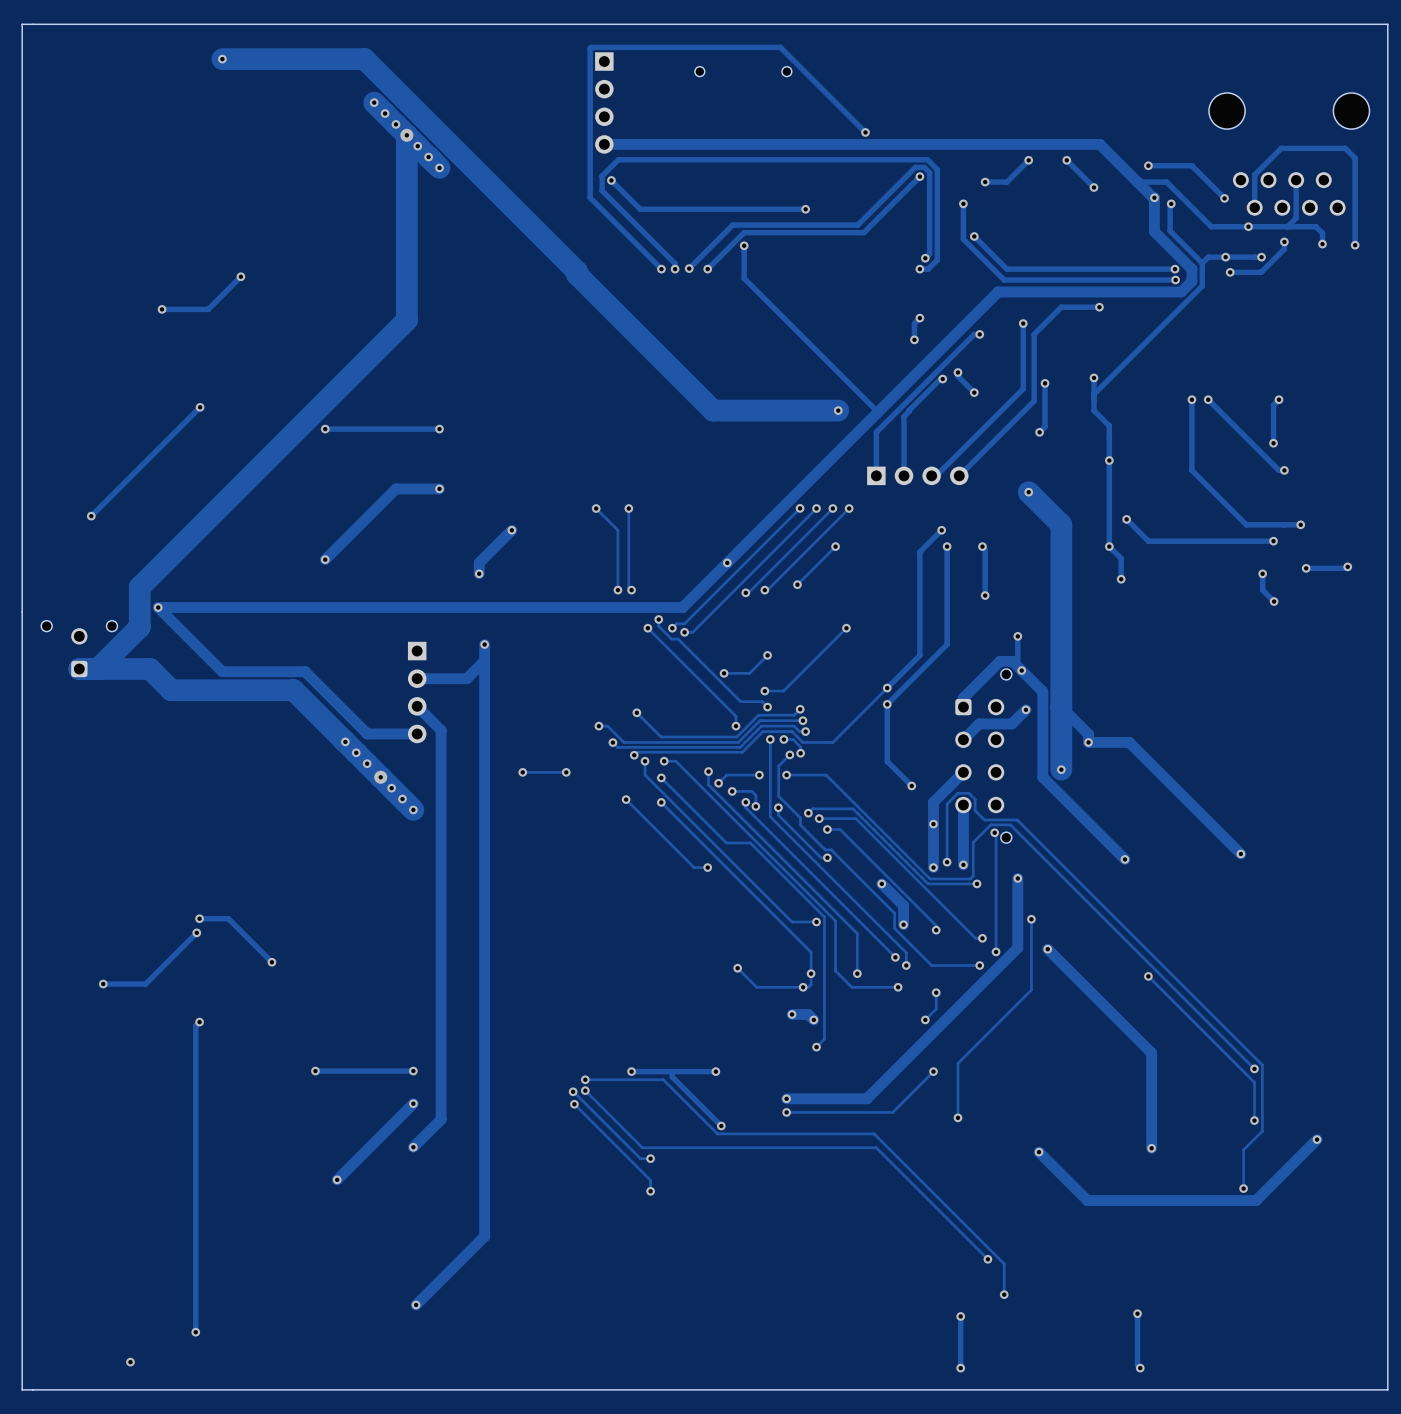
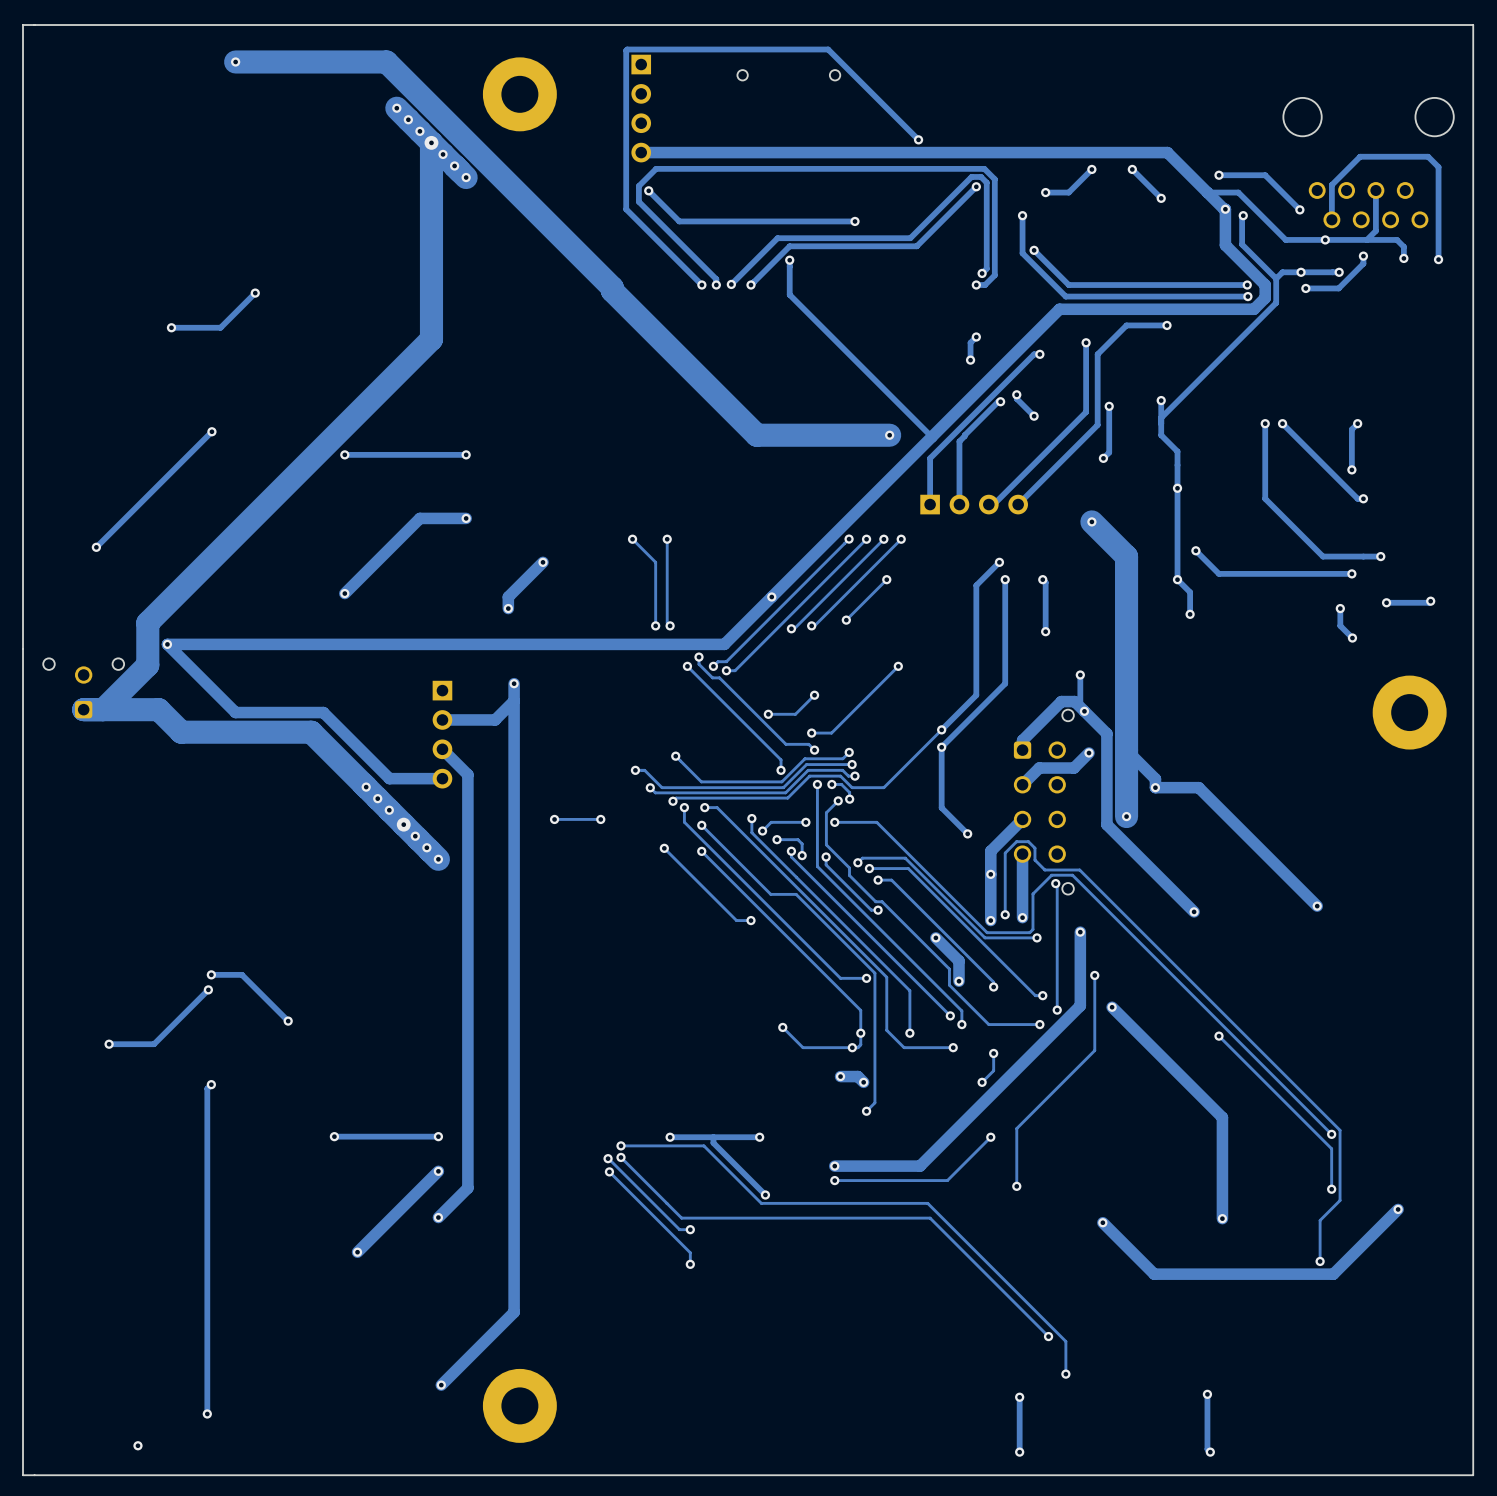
part: none -> (519, 94)
part: none -> (1409, 712)
part: none -> (519, 1405)

